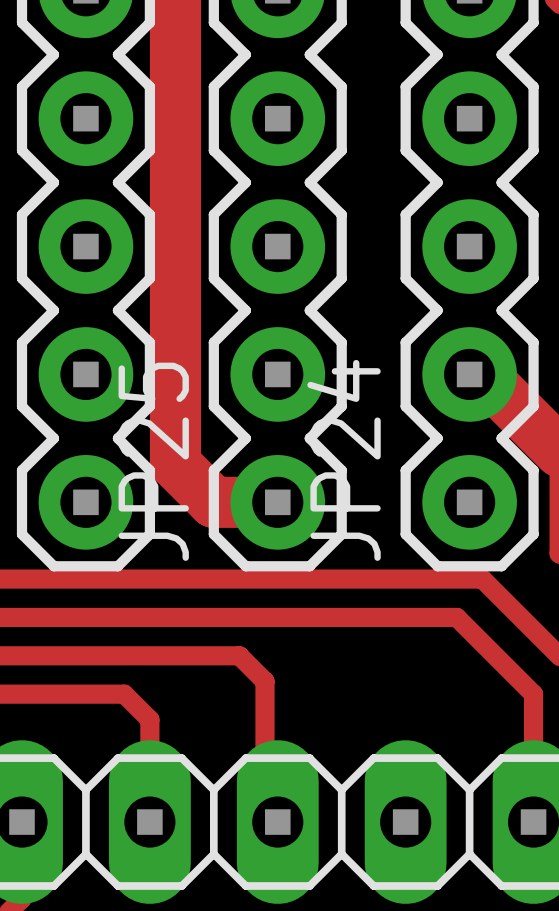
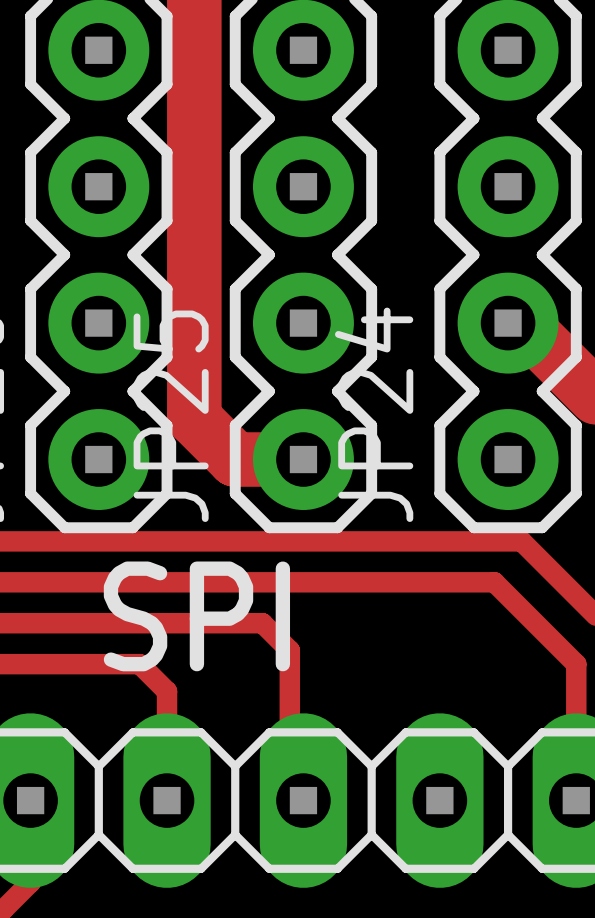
text: none -> SPI (196, 616)

